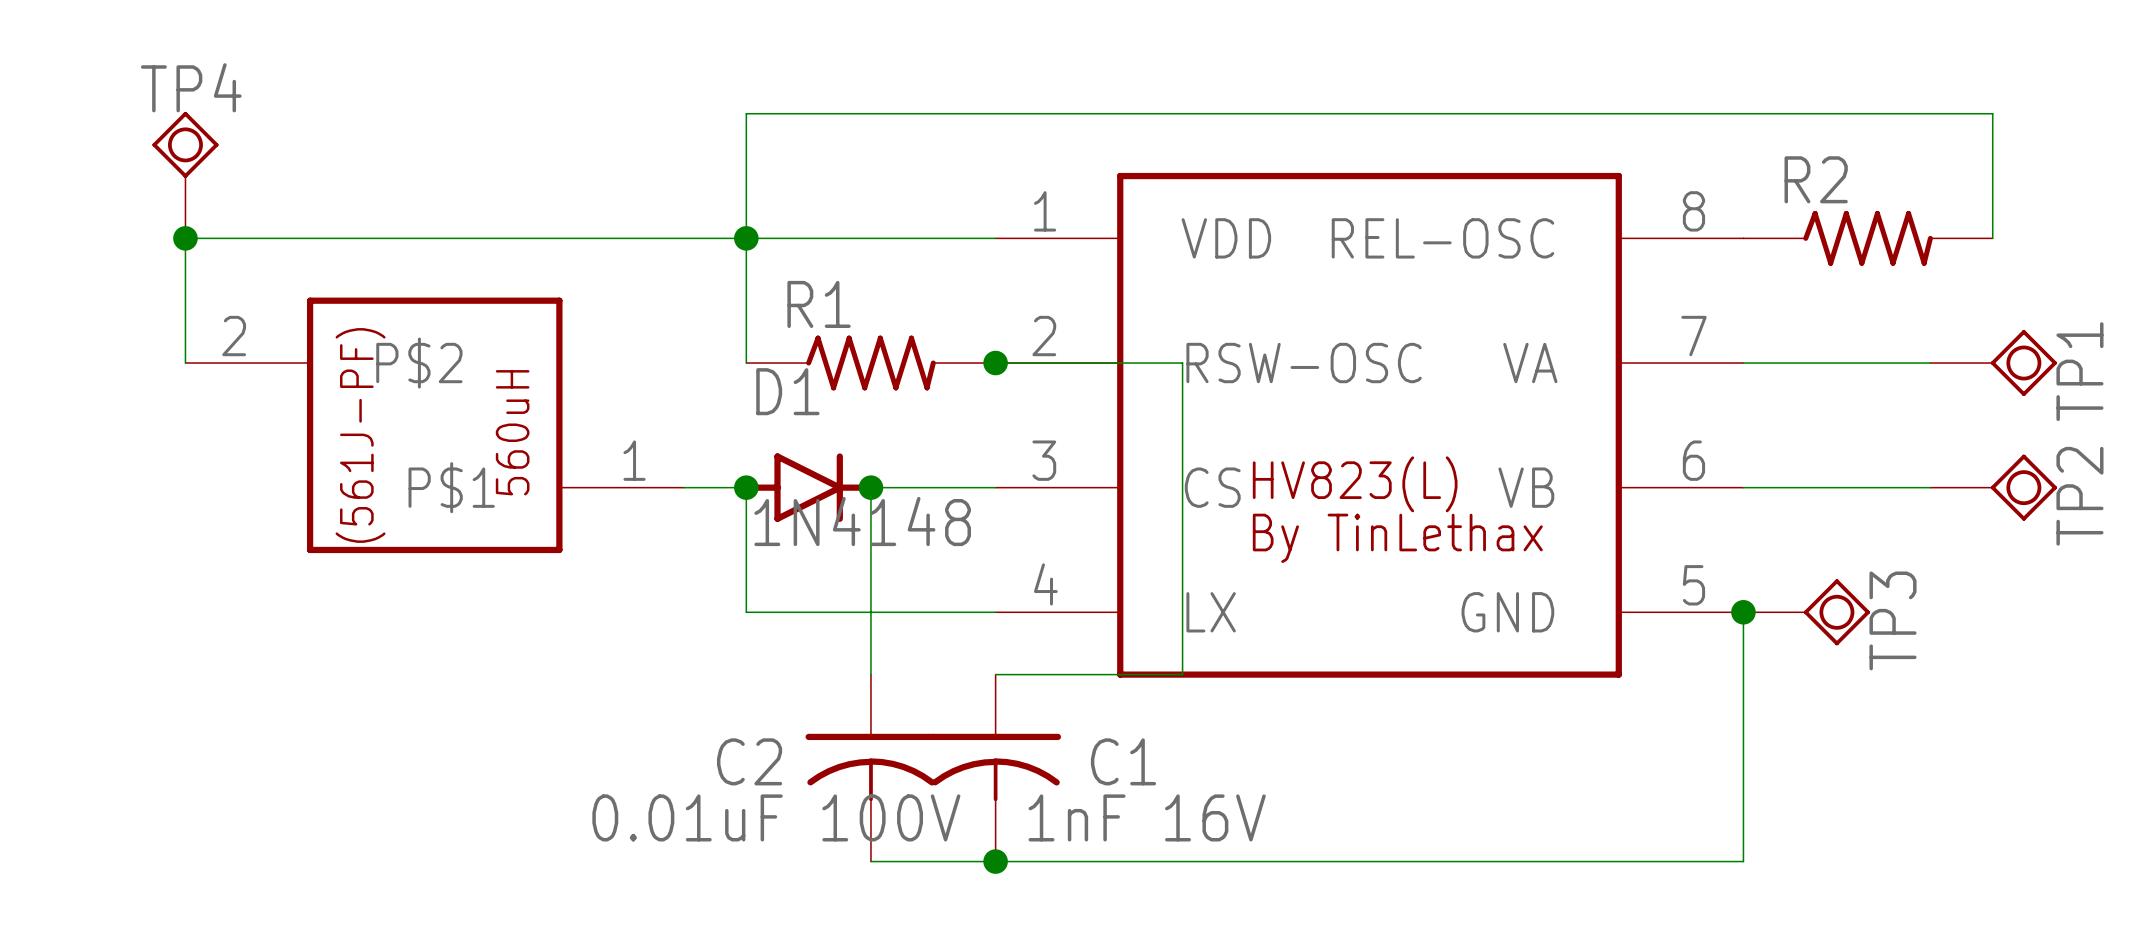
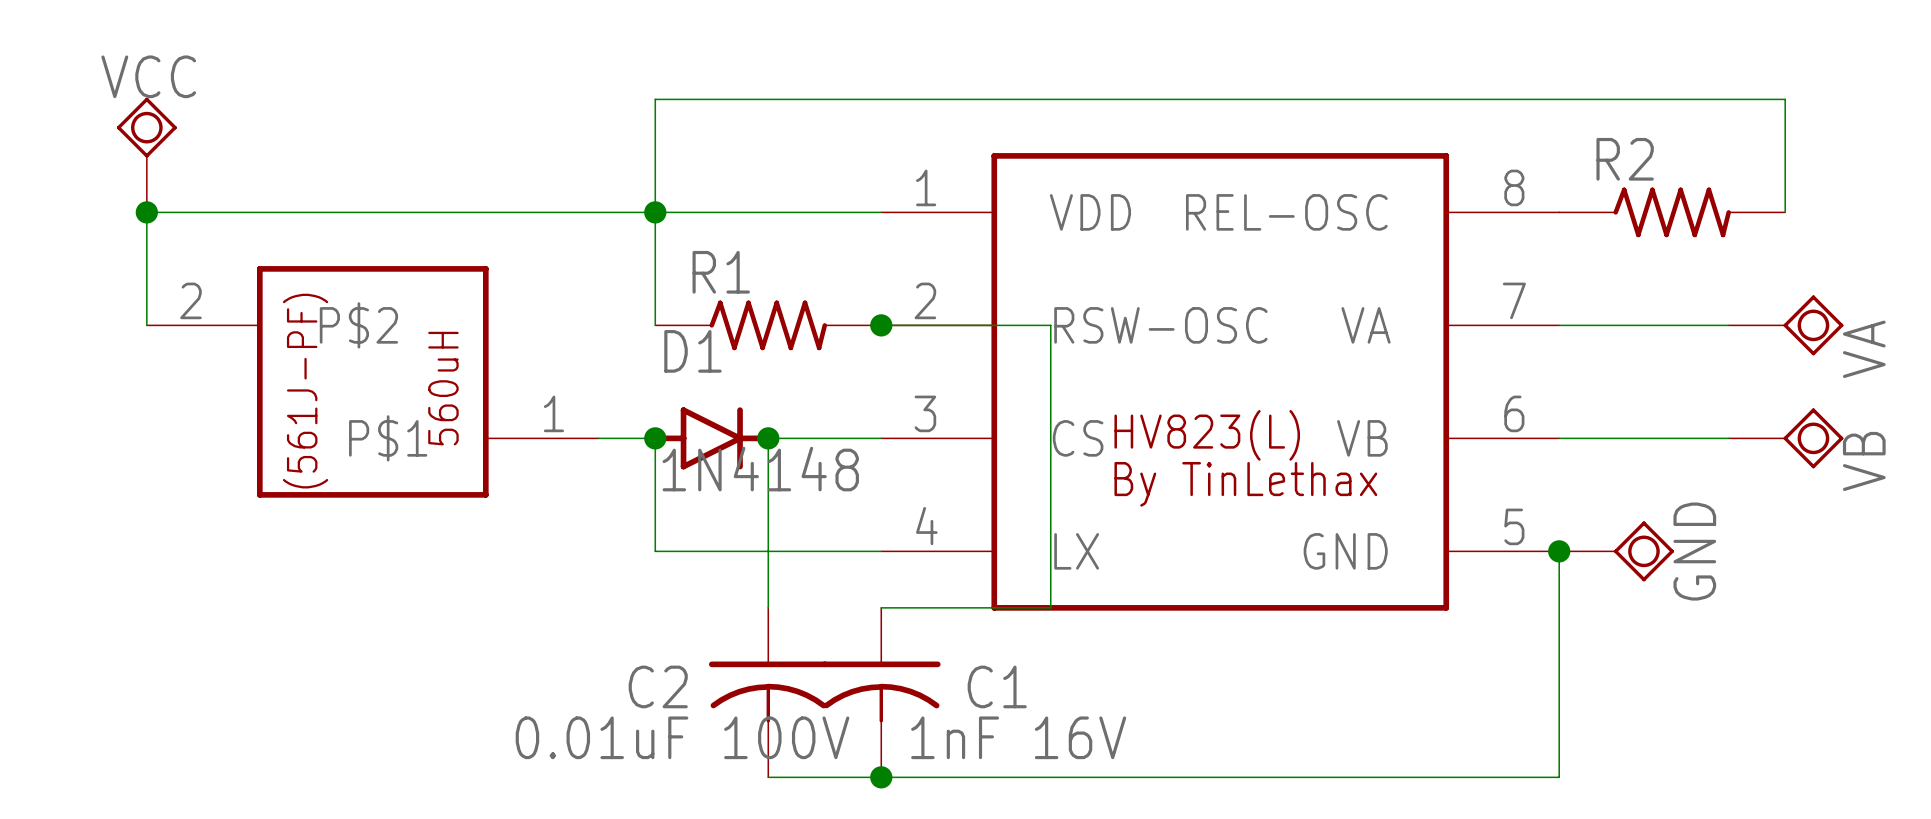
TP4 name: TP4 (191, 87) -> VCC (148, 76)
TP1 name: TP1 (2079, 371) -> VA (1864, 349)
TP2 name: TP2 (2079, 496) -> VB (1864, 461)
TP3 name: TP3 (1893, 620) -> GND (1694, 551)

